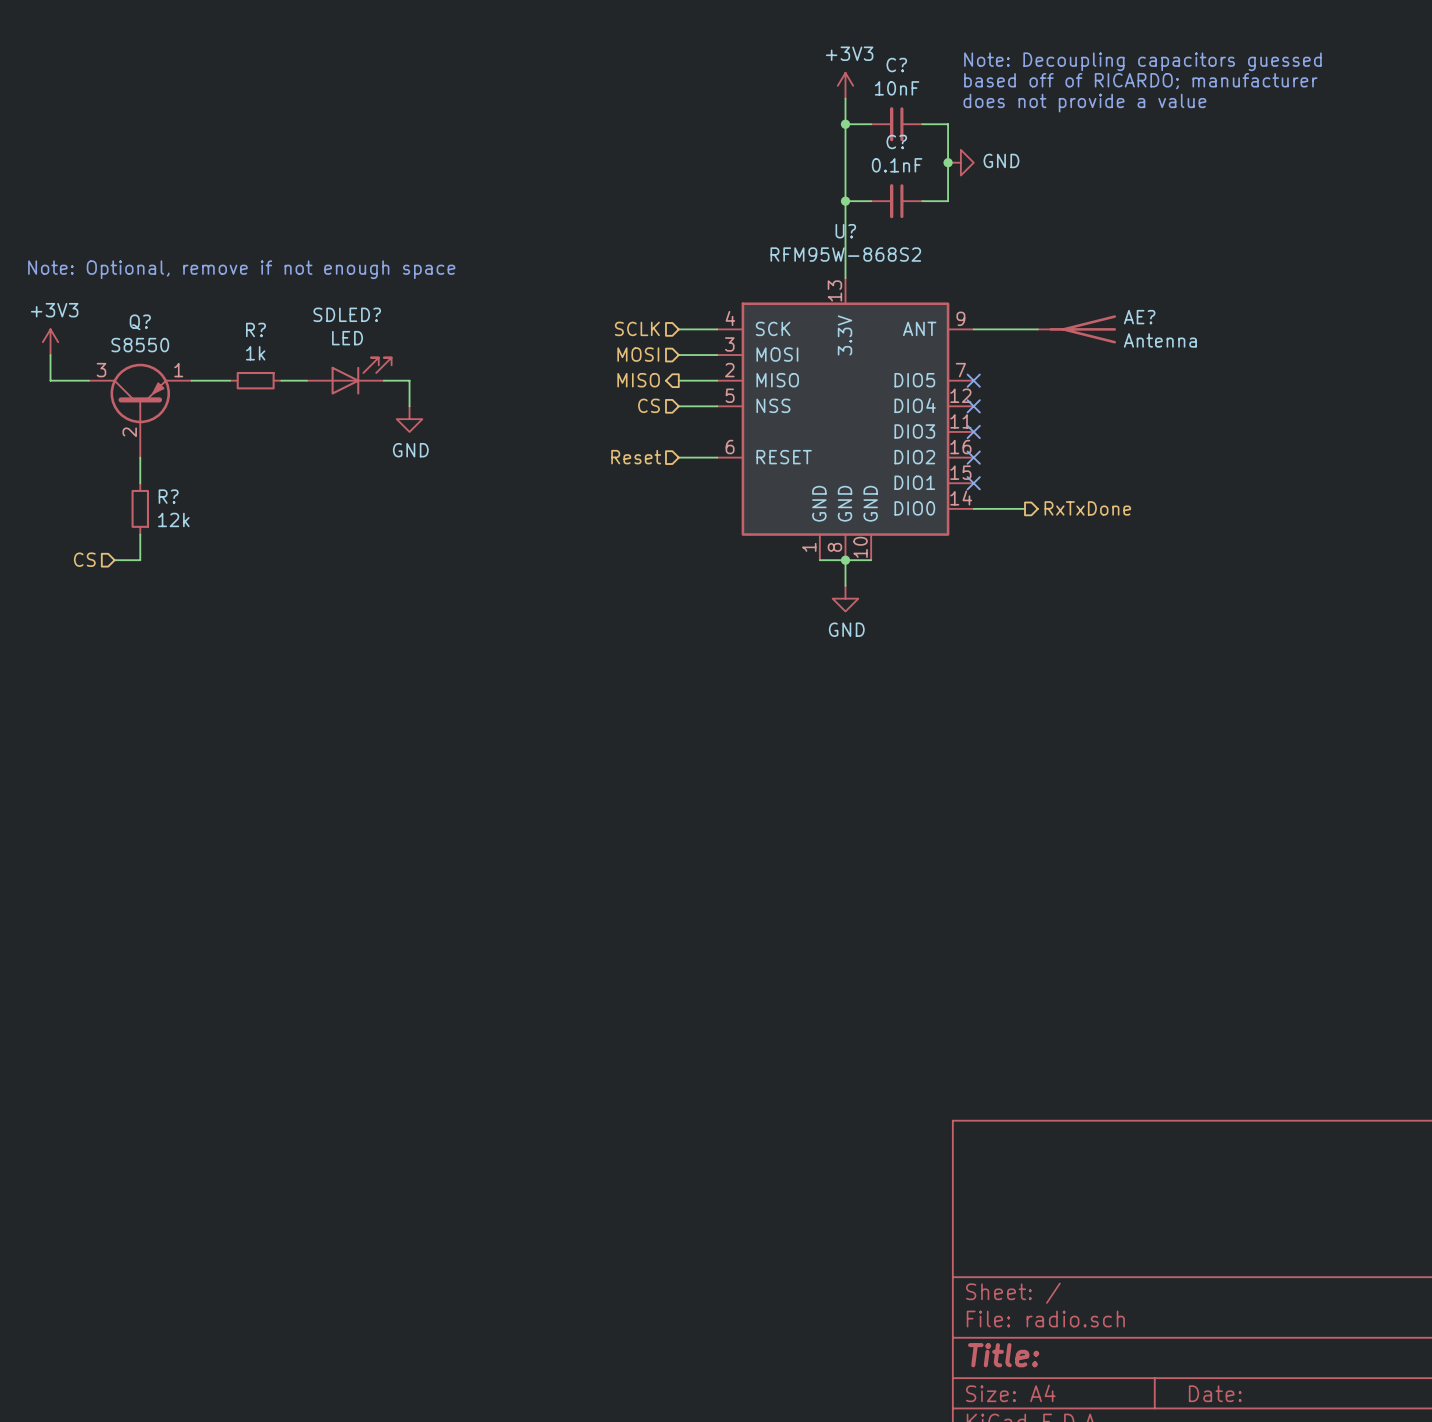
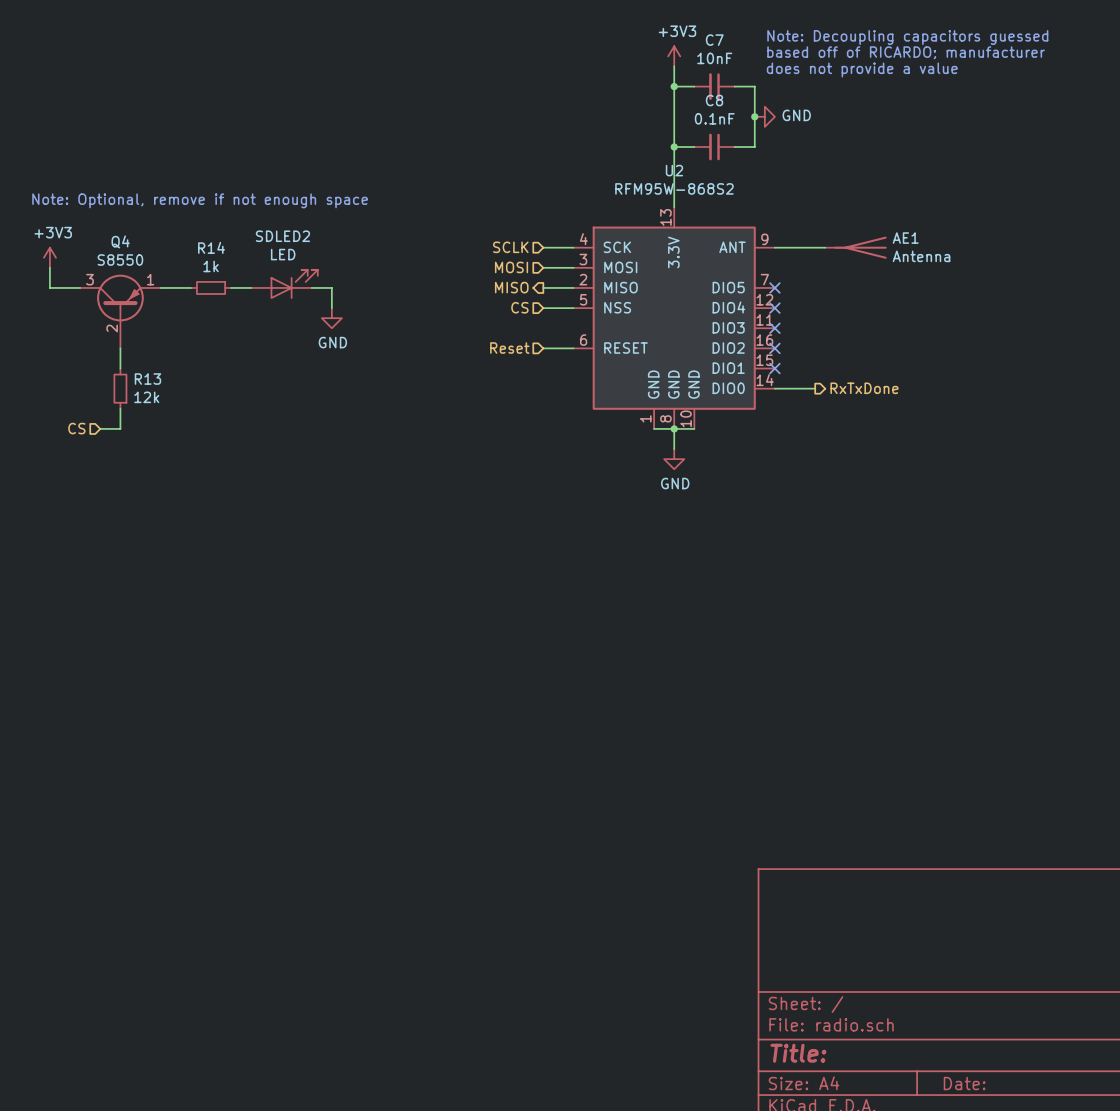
C? name: C? (896, 65) -> C7 (714, 40)
C? name: C? (896, 141) -> C8 (714, 100)
U? name: U? (845, 231) -> U2 (674, 170)
SDLED? name: SDLED? (347, 314) -> SDLED2 (282, 236)
AE? name: AE? (1139, 317) -> AE1 (905, 238)
Q? name: Q? (140, 322) -> Q4 (120, 241)
R? name: R? (255, 329) -> R14 (211, 247)
R? name: R? (168, 496) -> R13 (147, 379)

